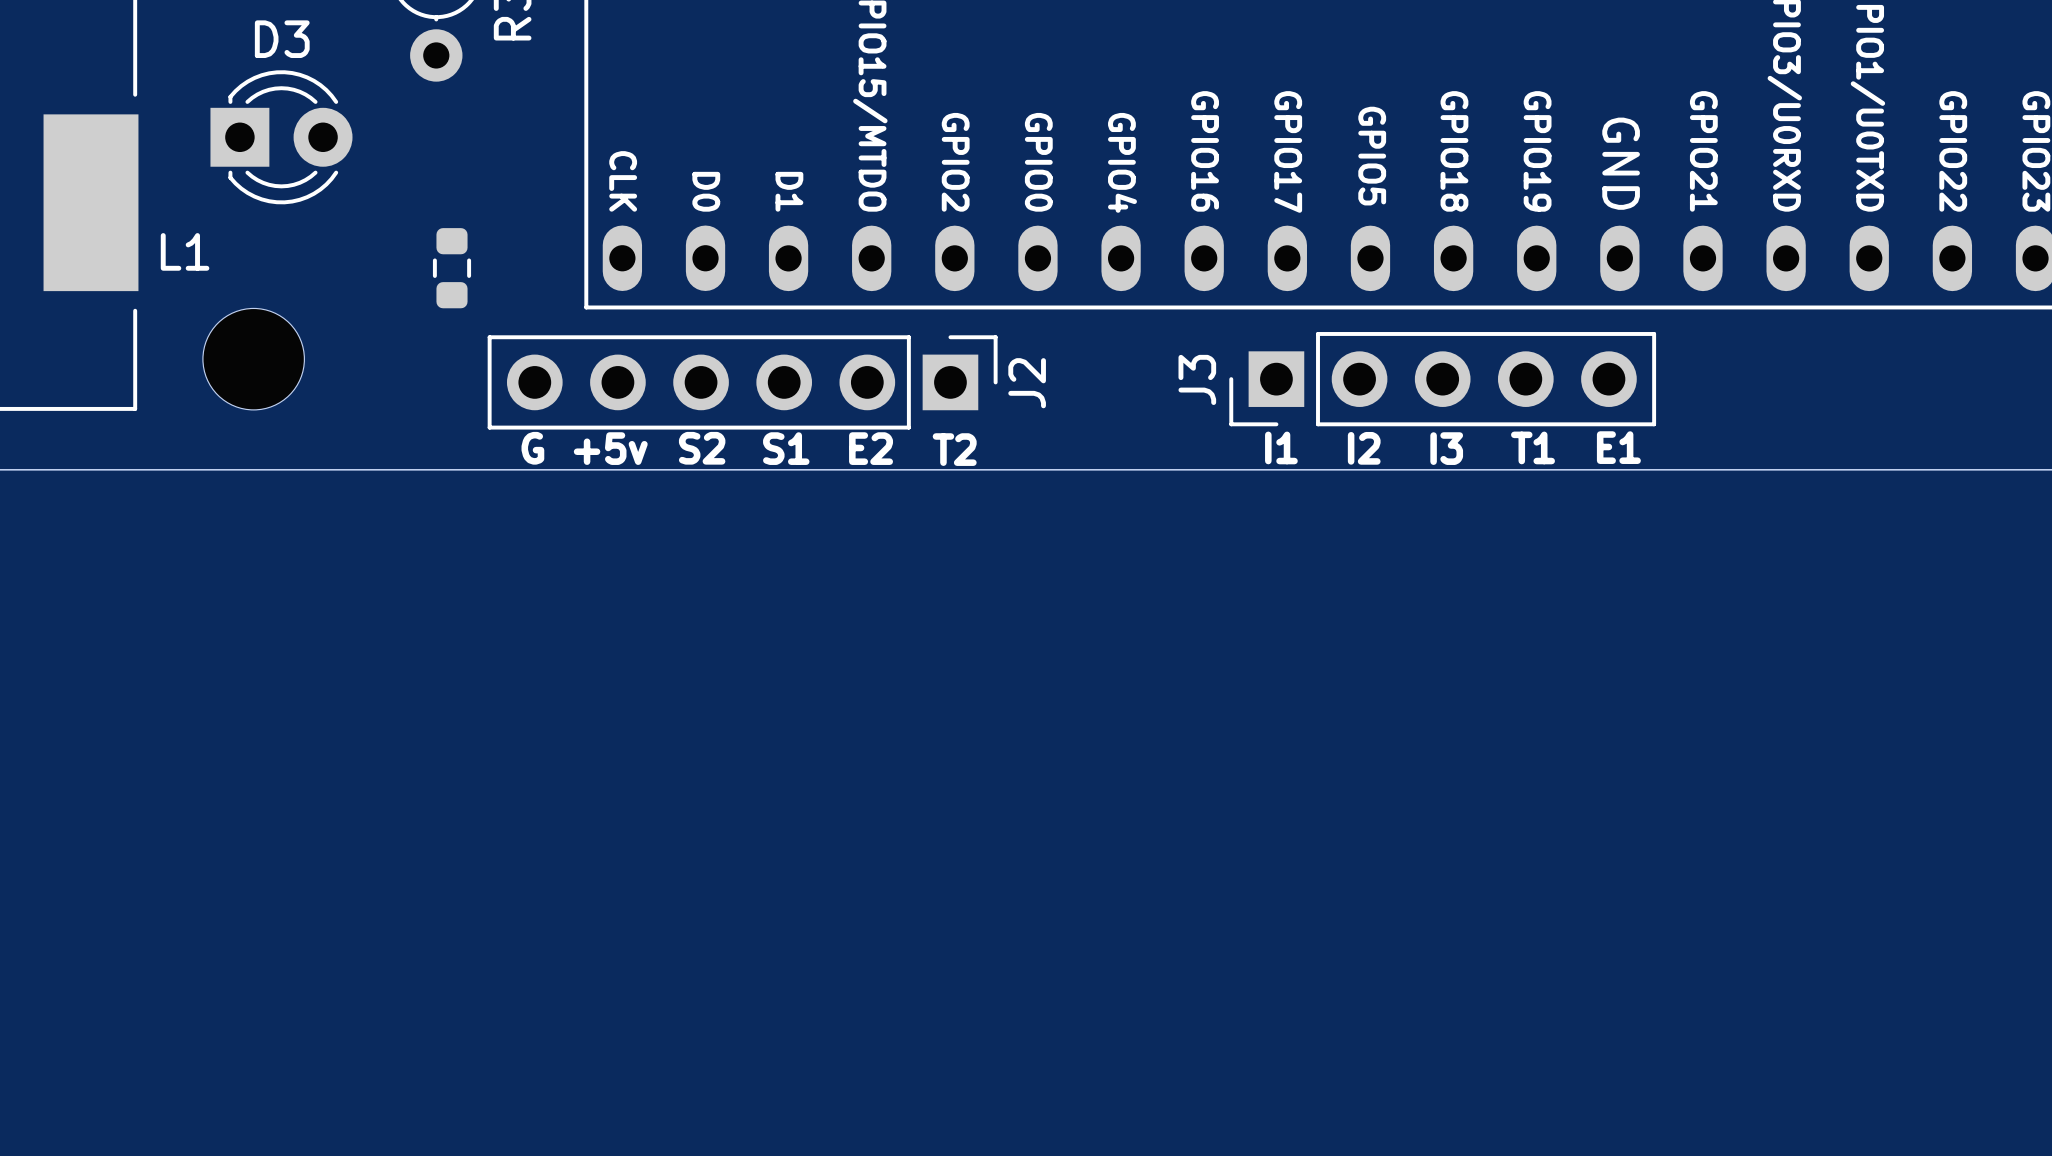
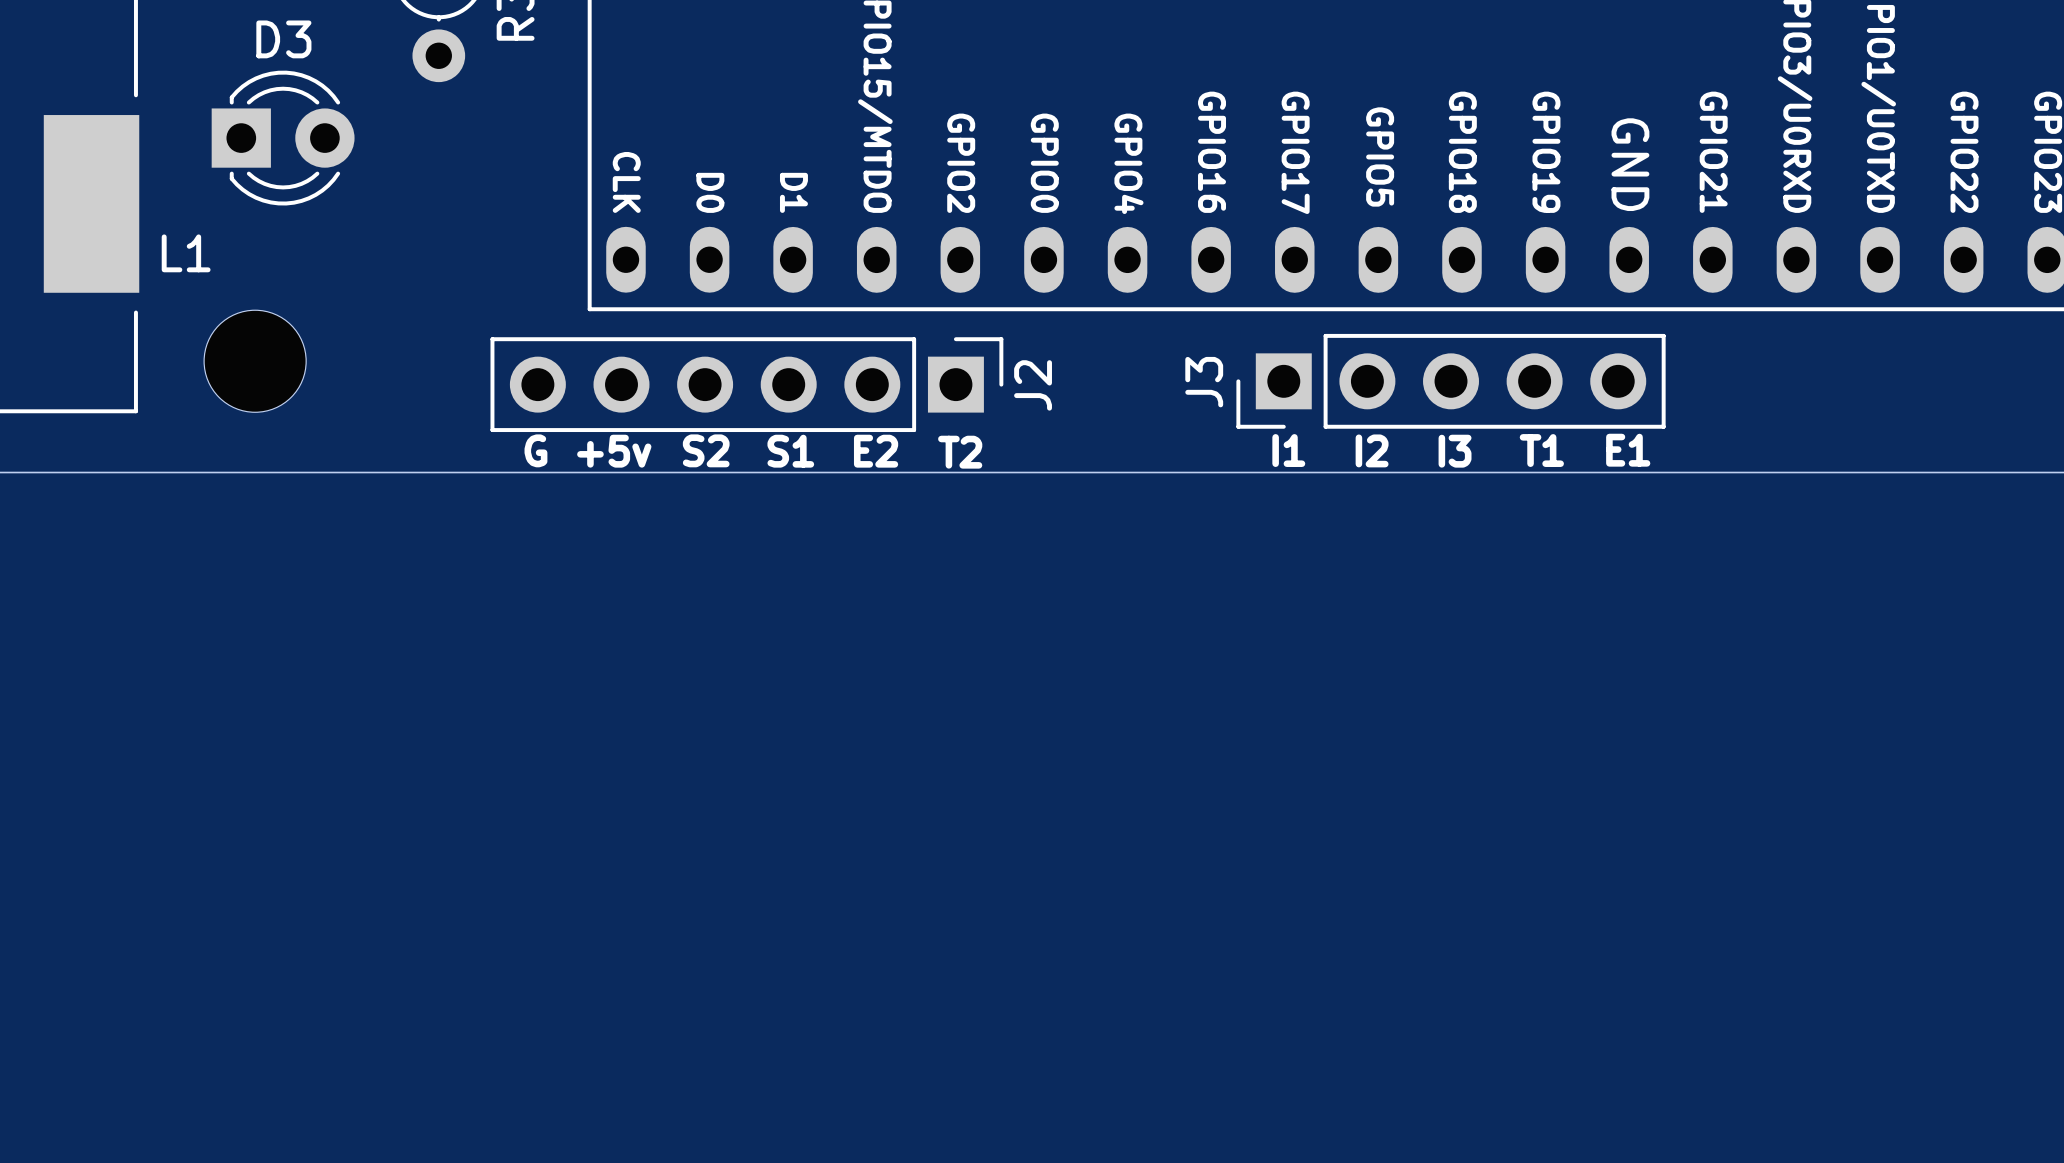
part: (452, 268) -> none

